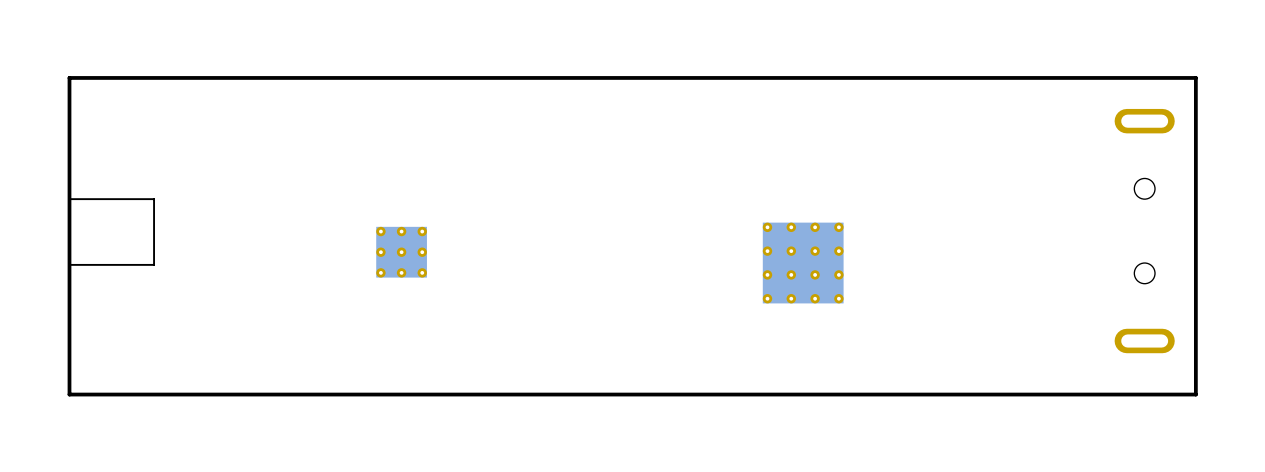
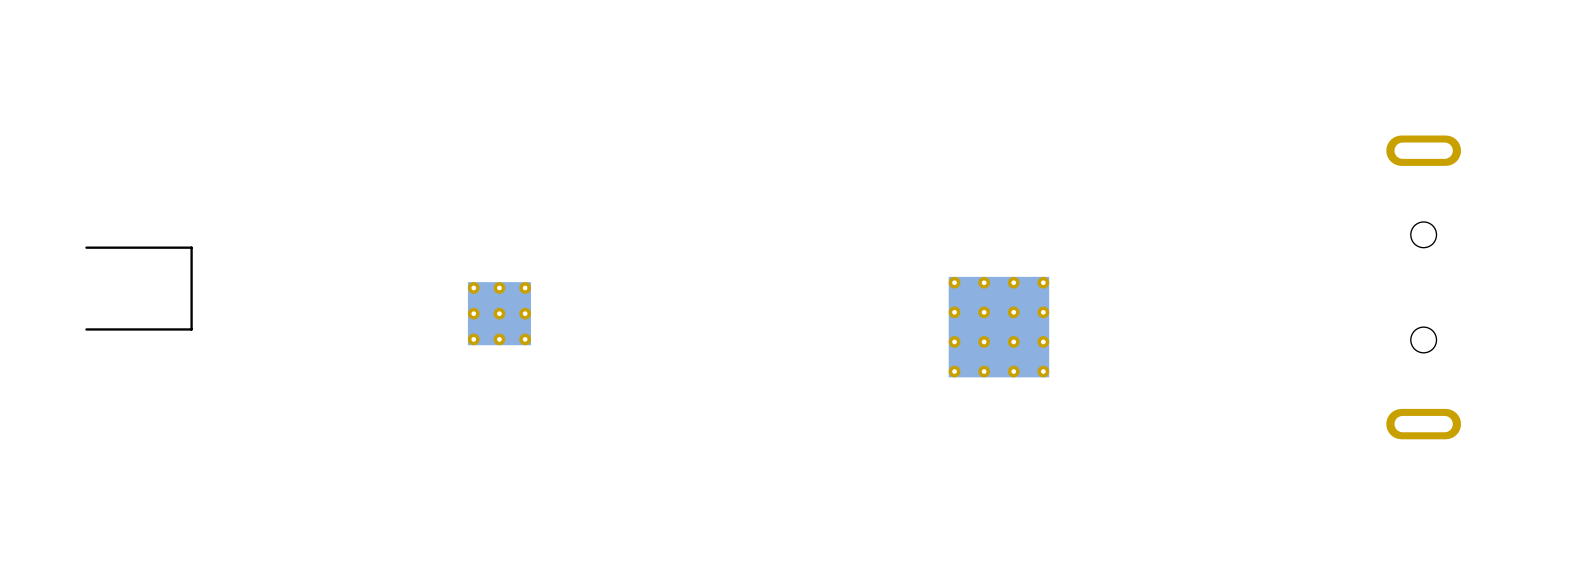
board edge: (1195, 77) (69, 77) (69, 394) (1195, 394) (1195, 77) -> none

